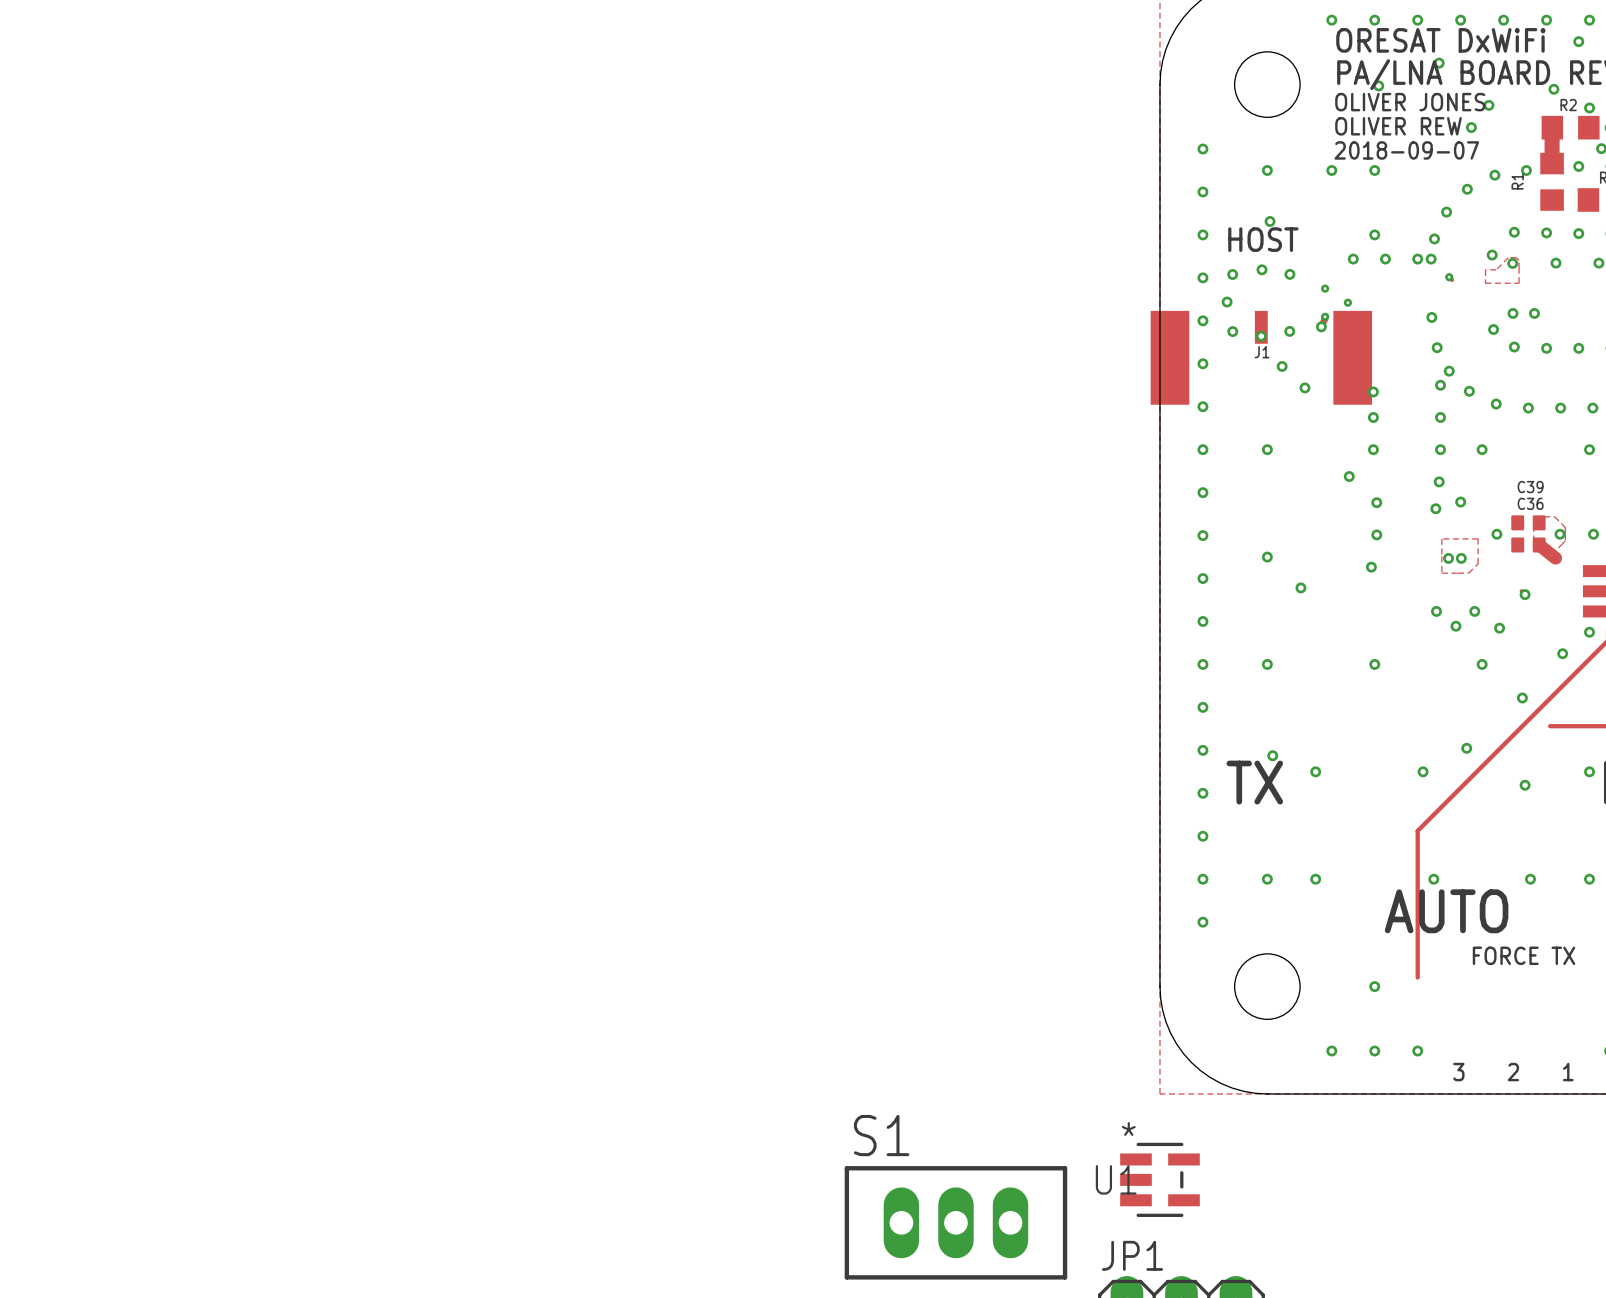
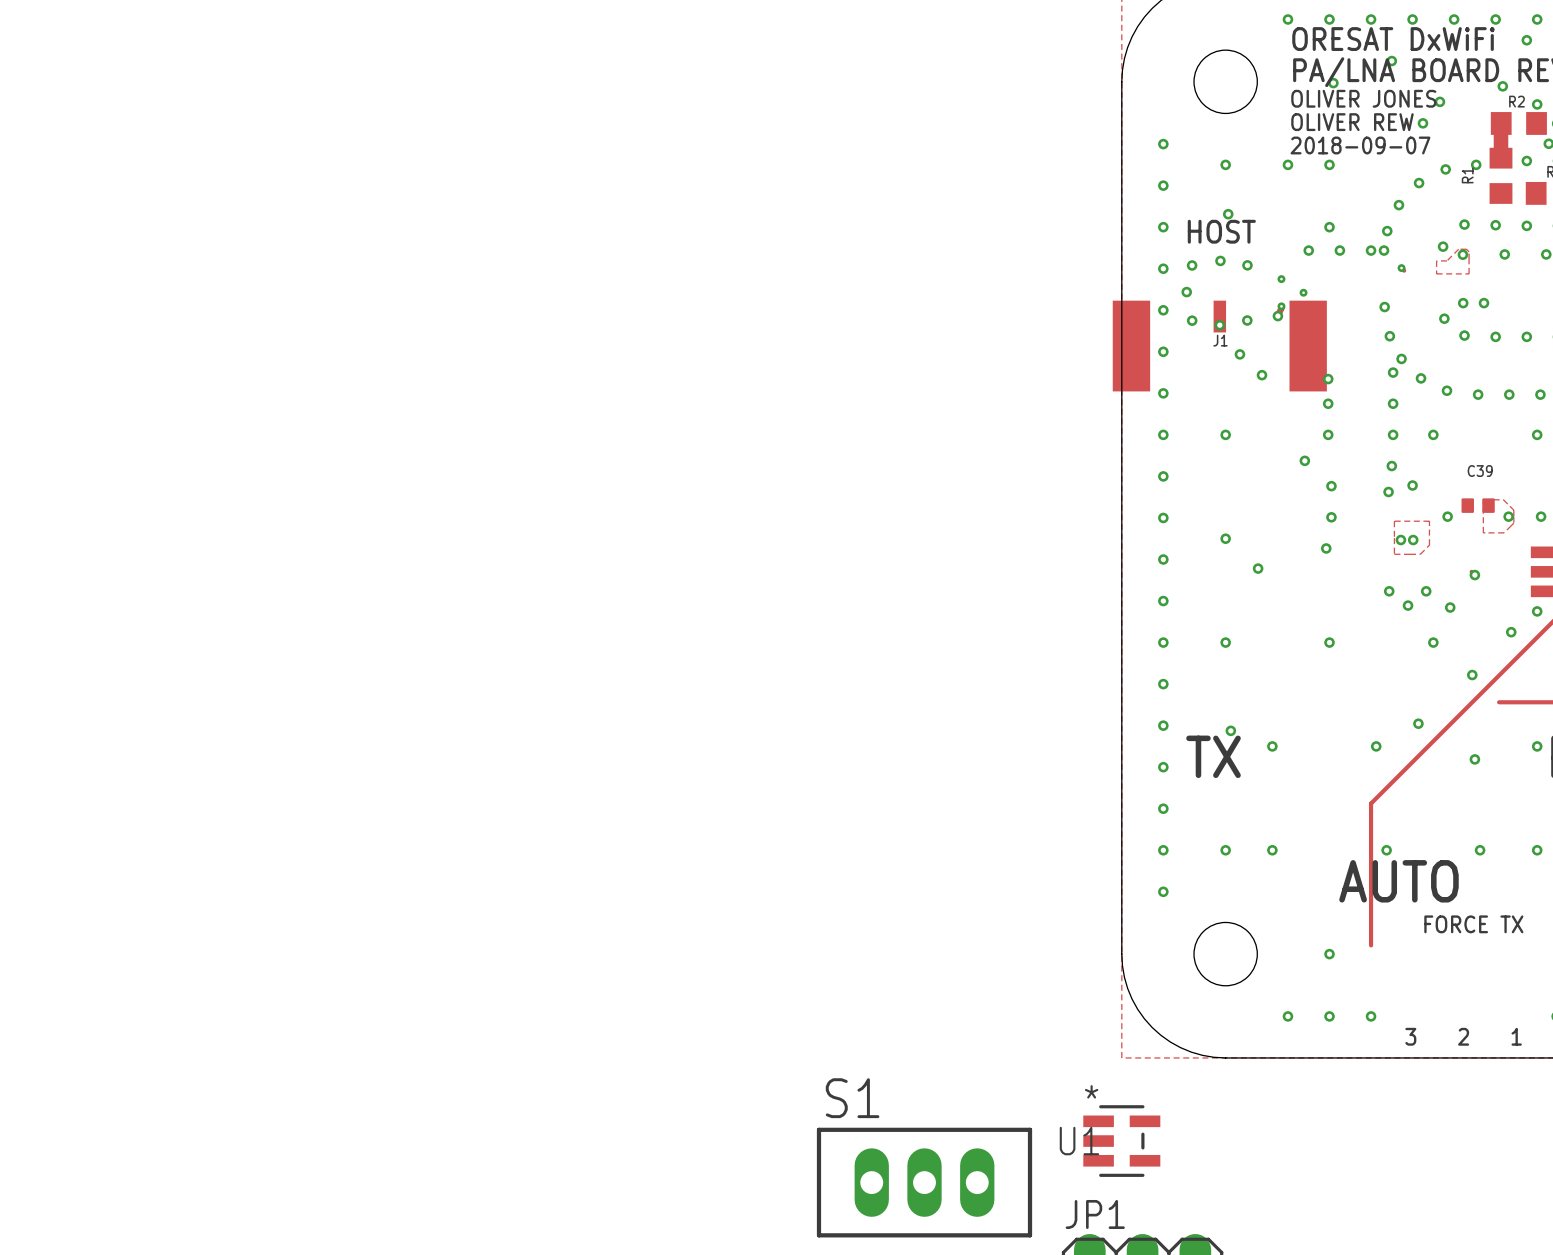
C36: (1528, 544) -> none
track: (1539, 544) (1555, 558) -> none

